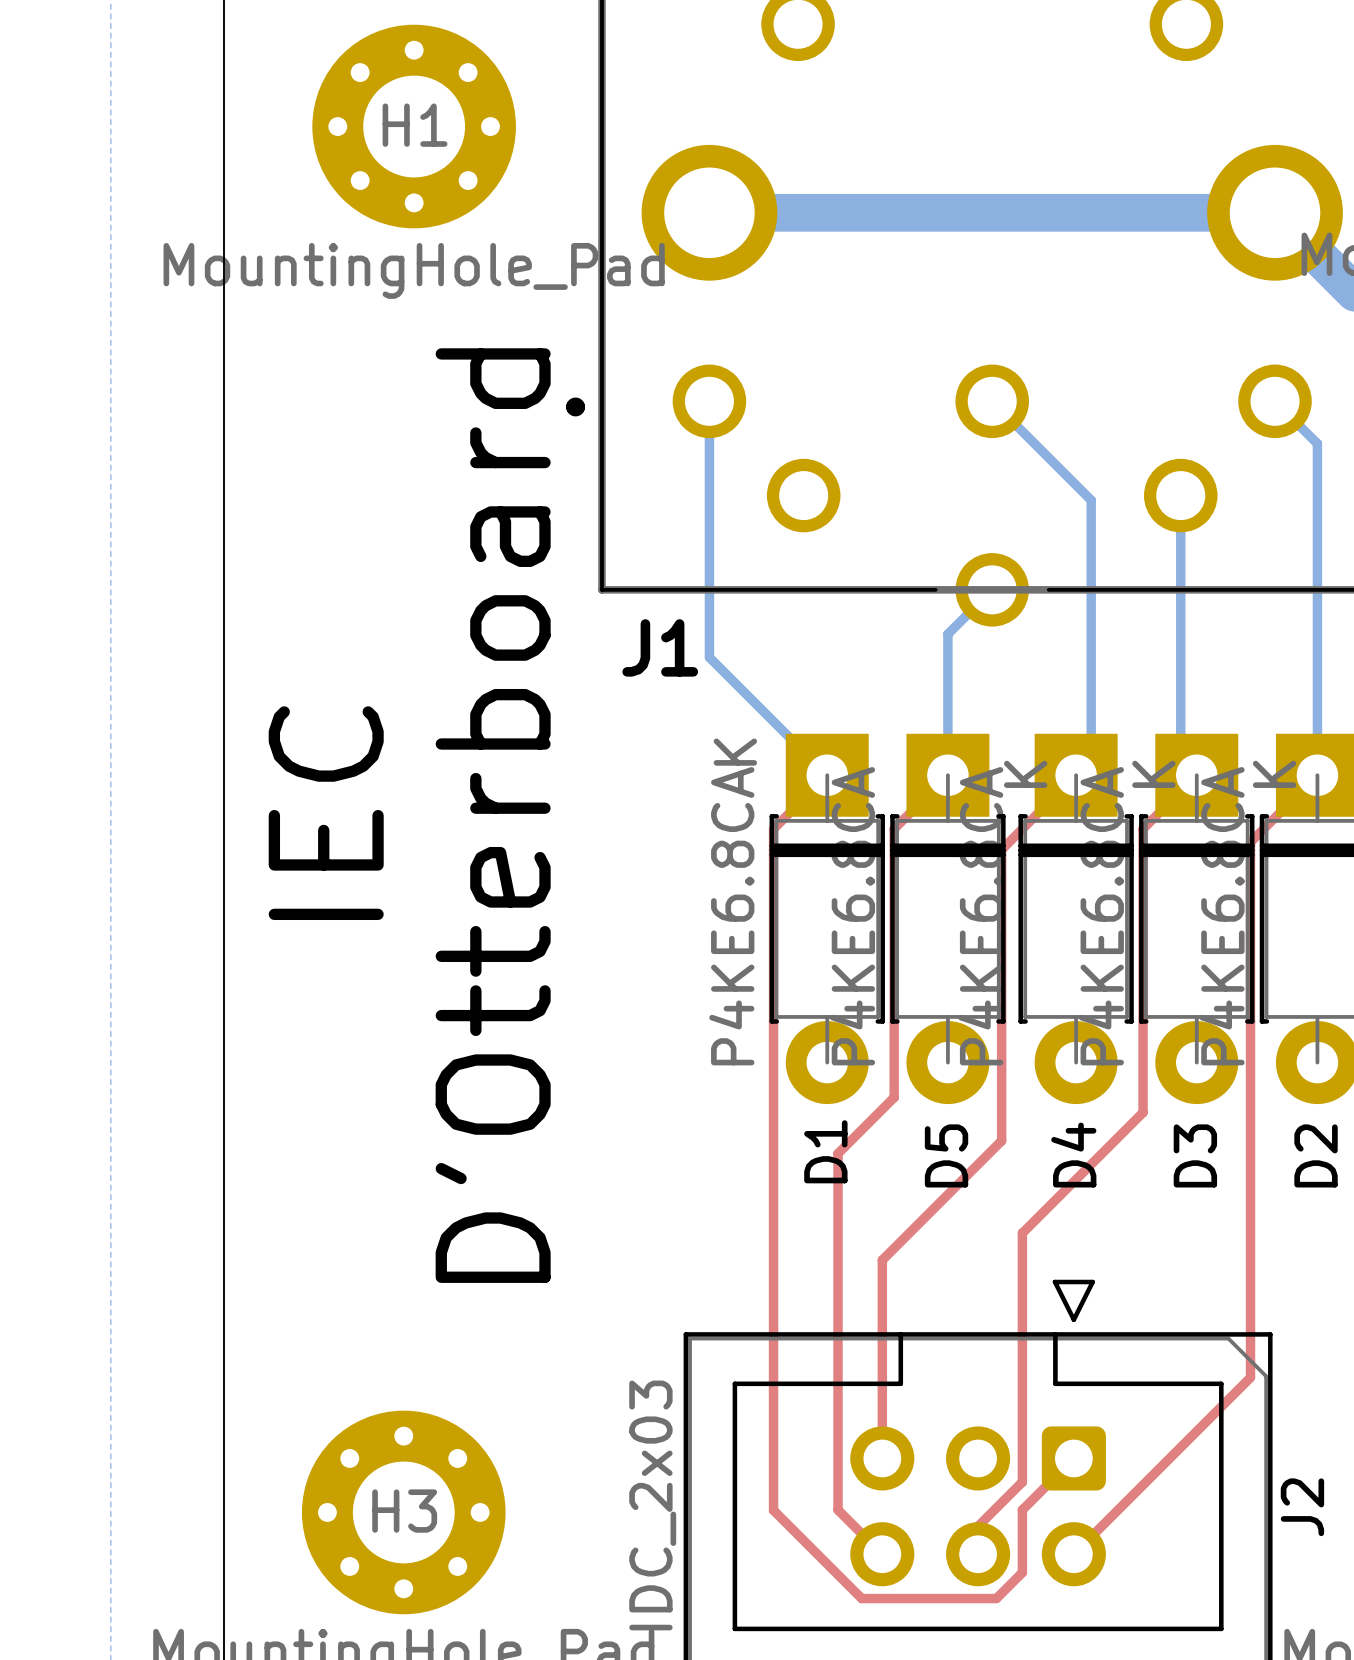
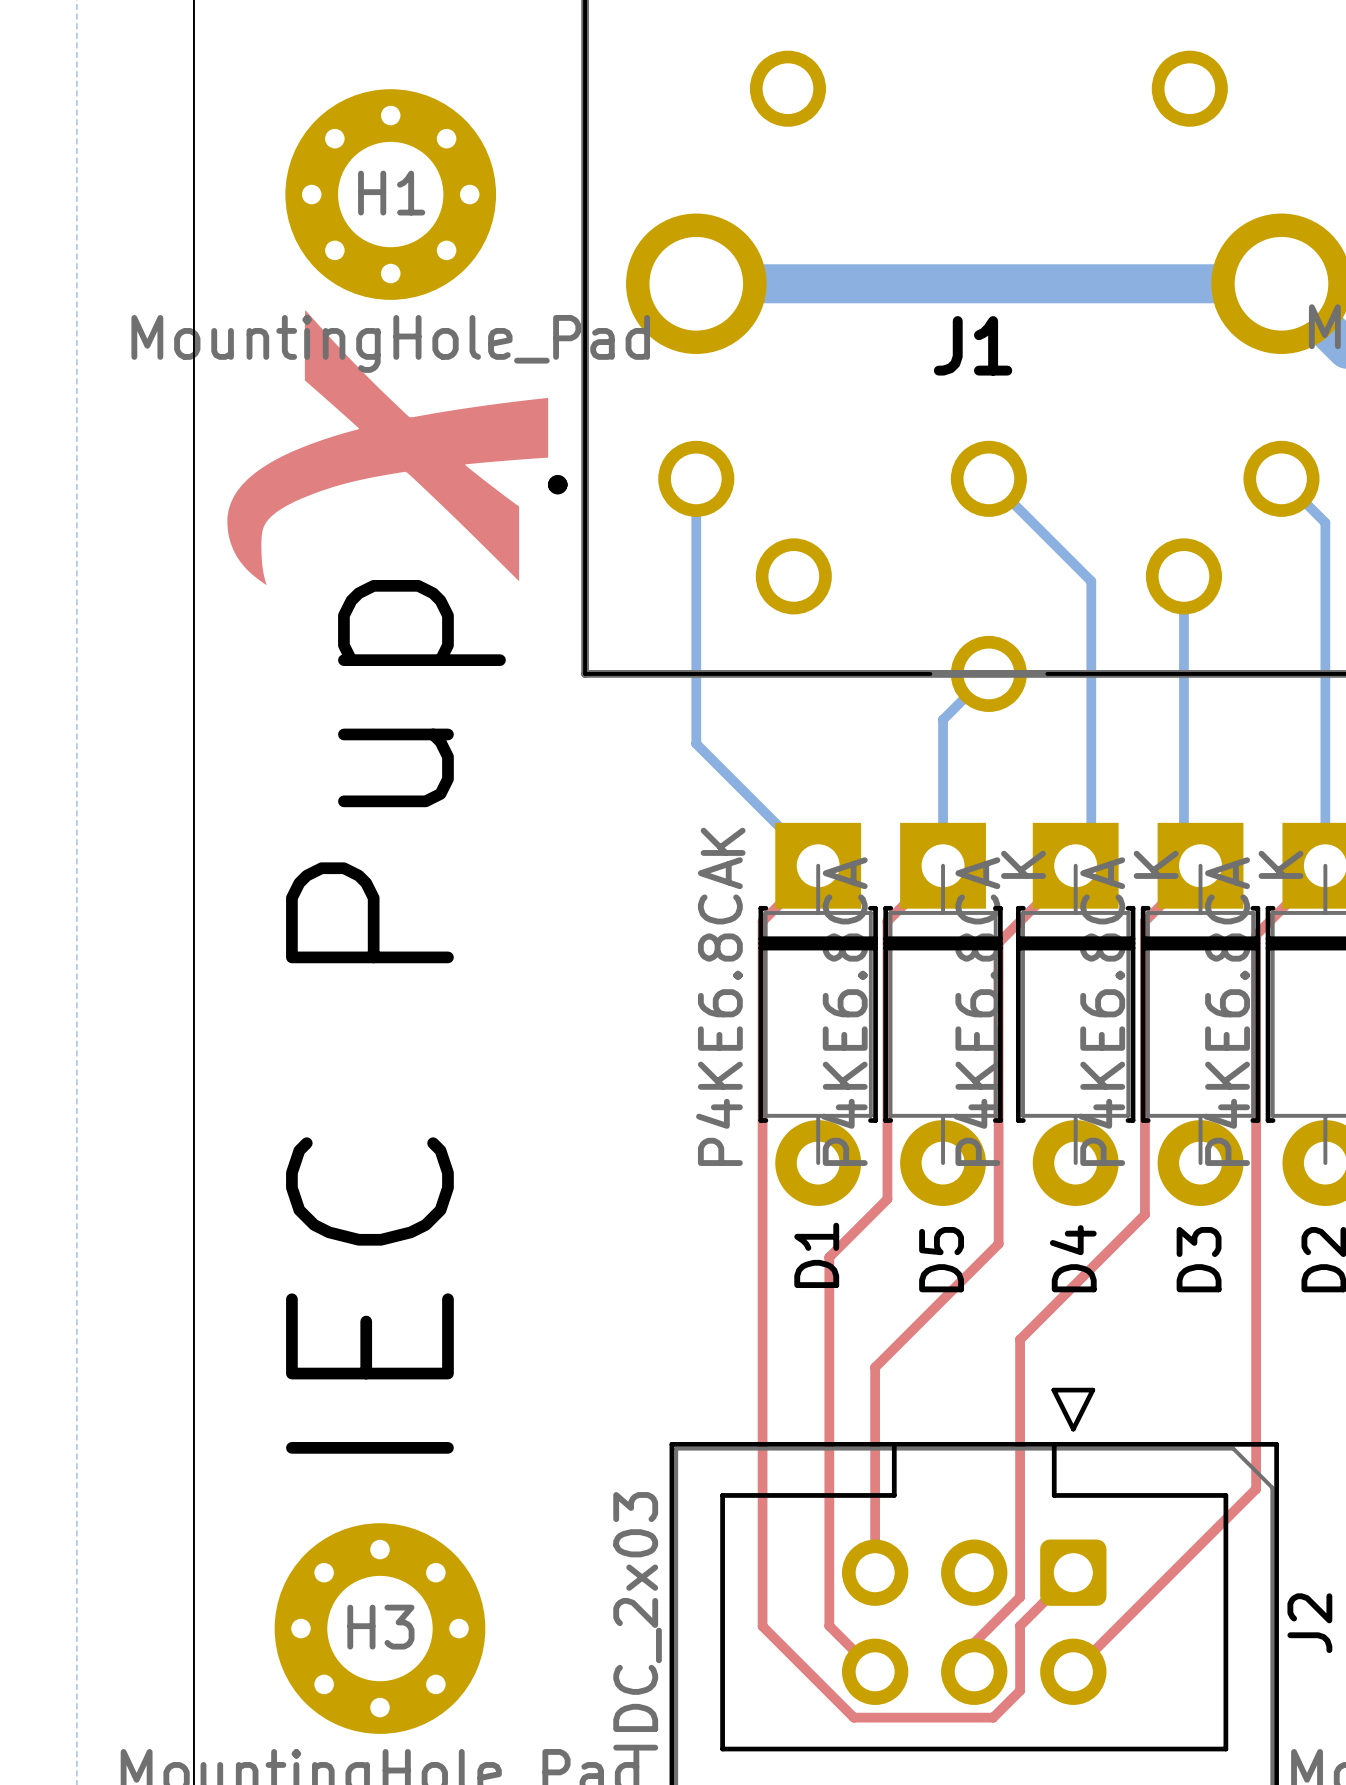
drawing: none -> [227, 310, 549, 585]
J1 name position: J1 (660, 647) -> J1 (973, 345)
text: IEC (326, 813) -> none
text: D'Otterboard (493, 815) -> none
text: none -> IEC Pup (395, 1016)

